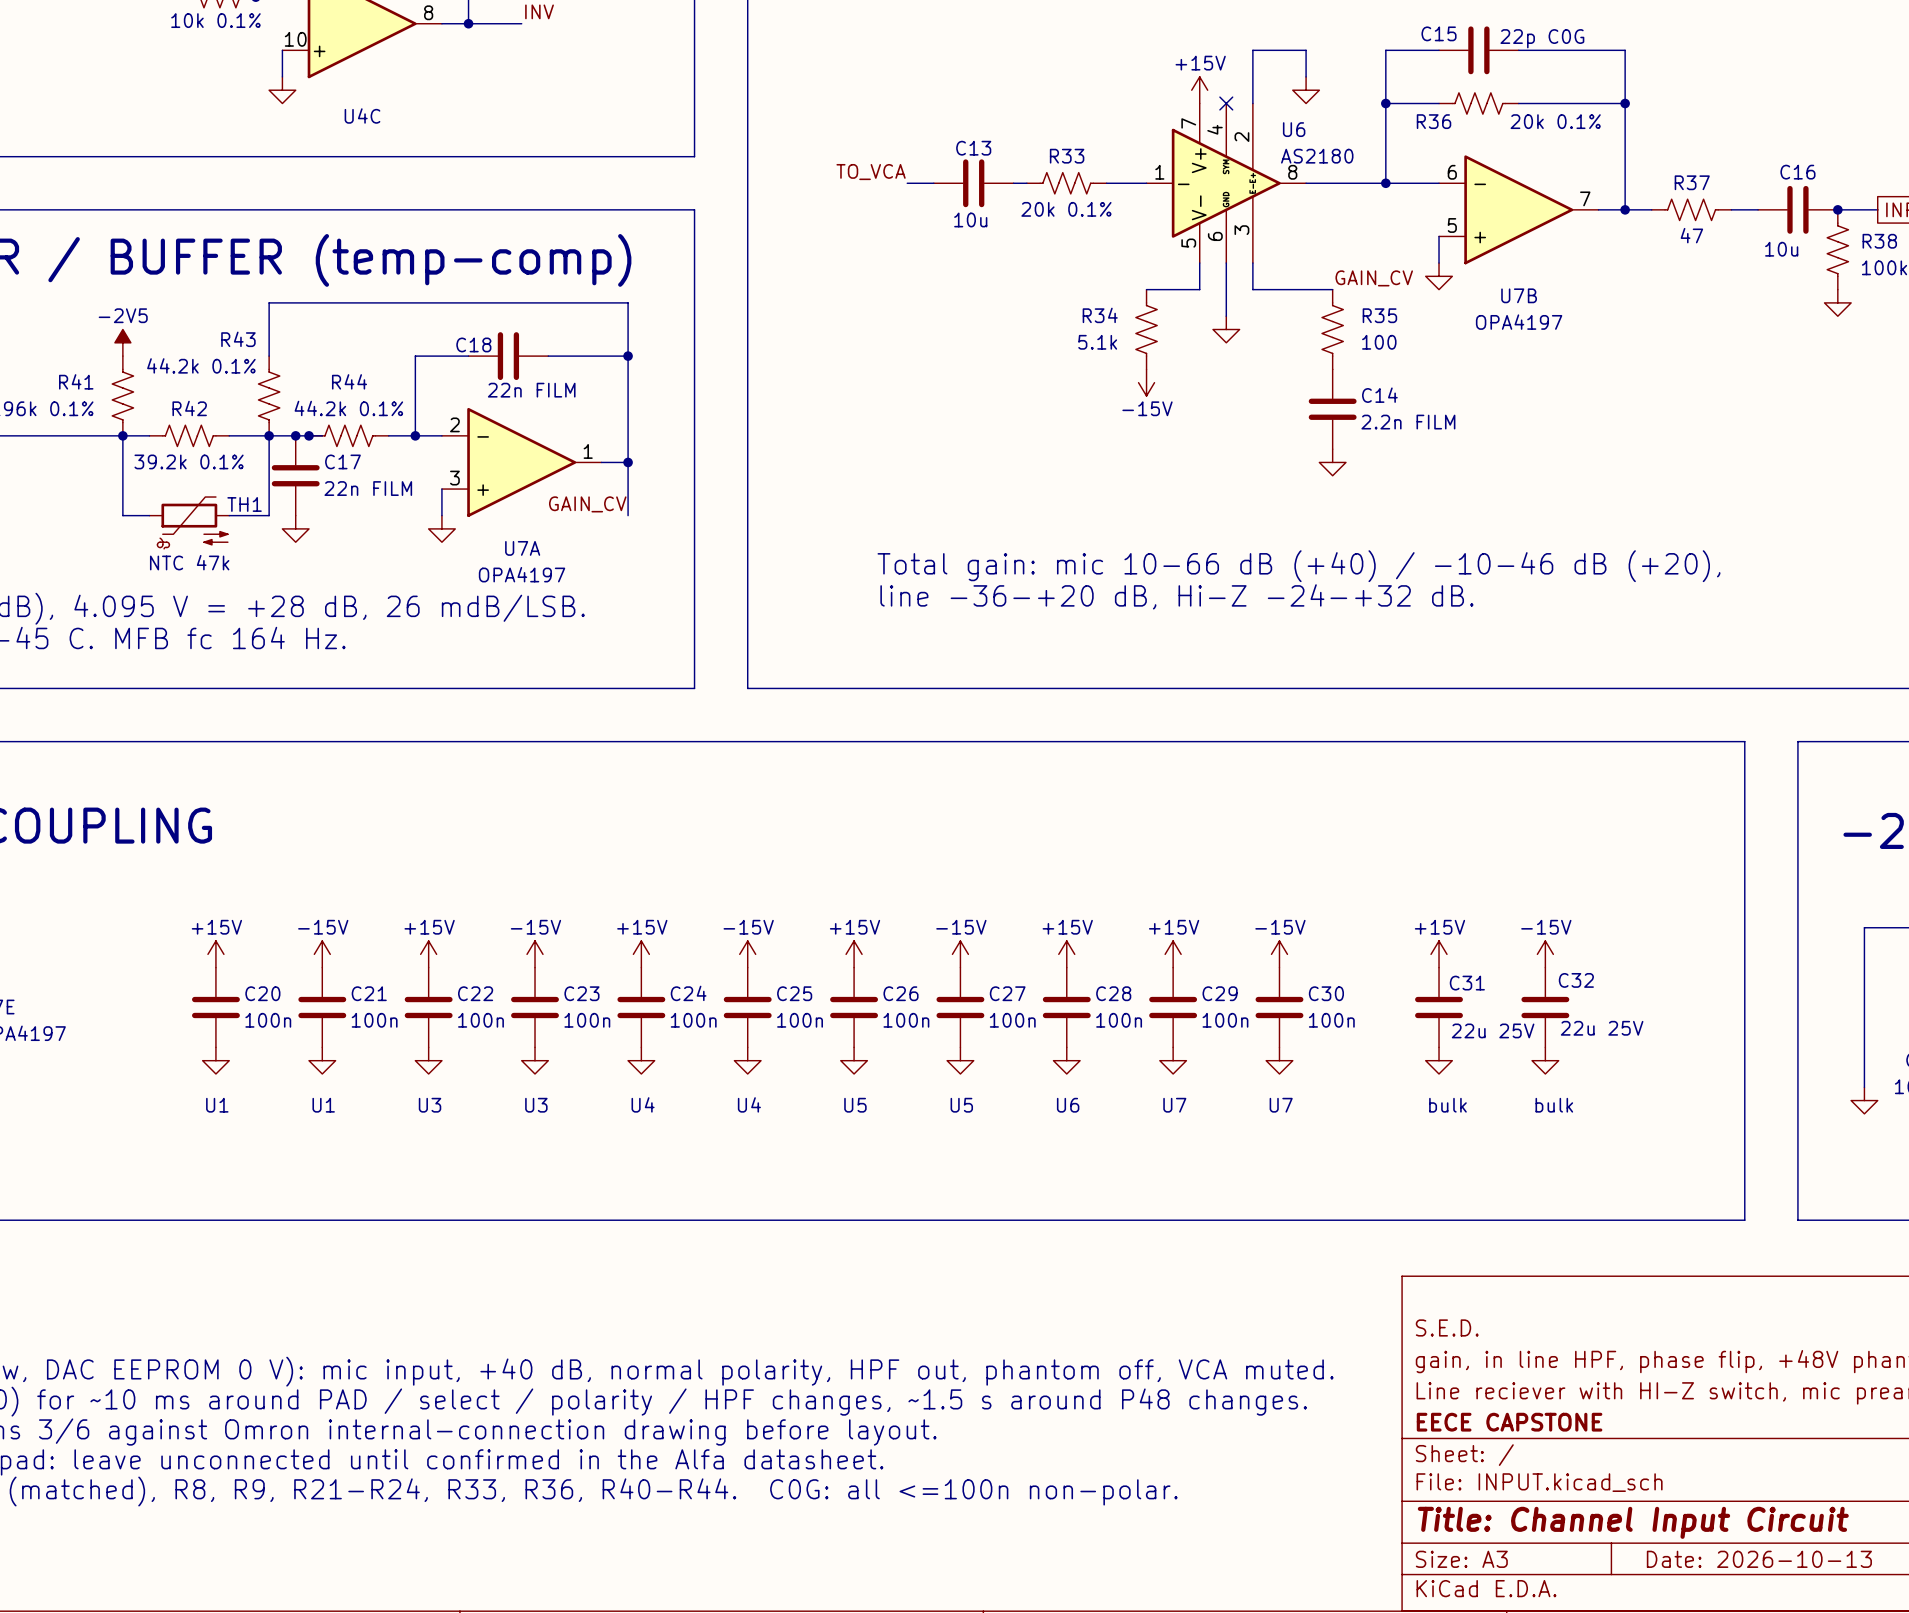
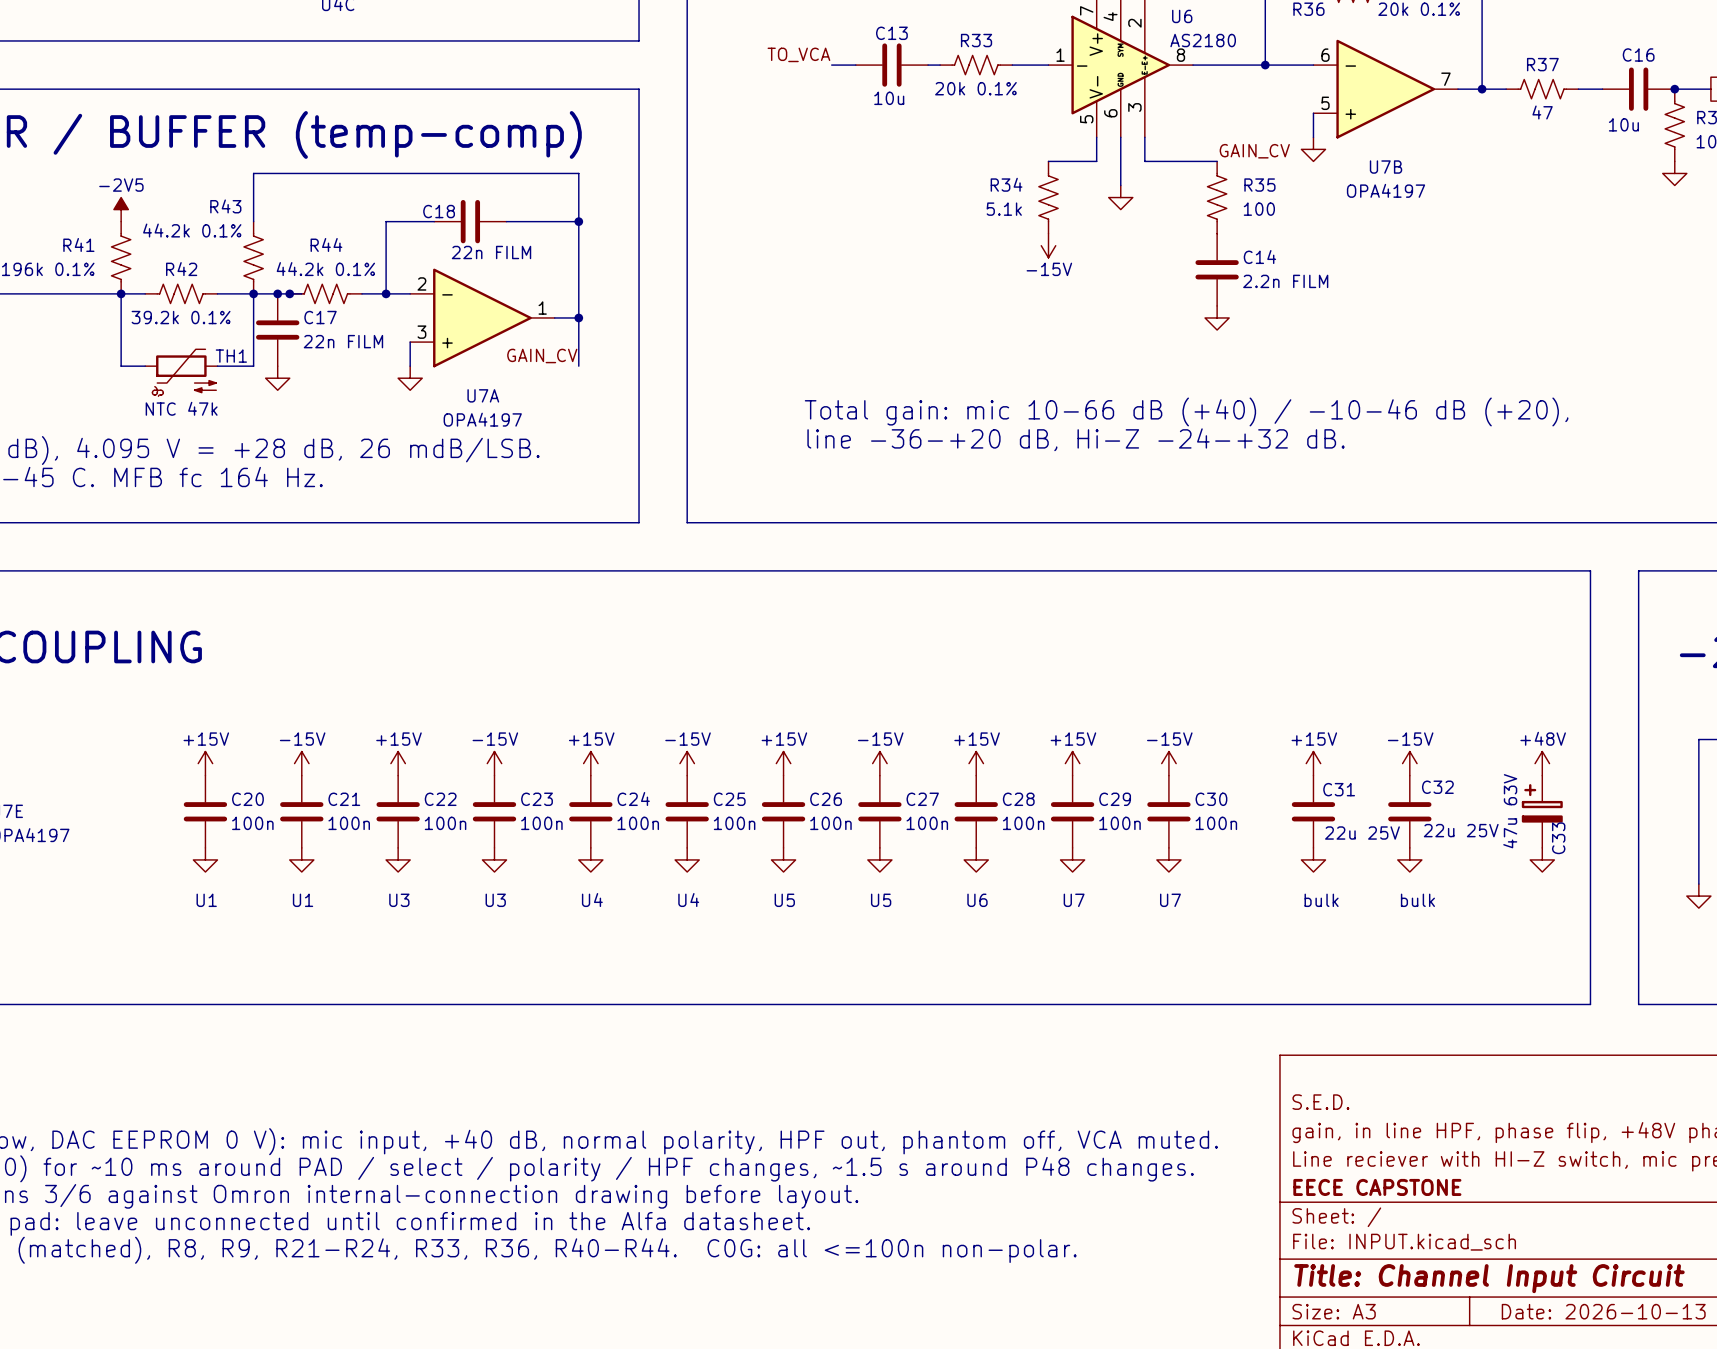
power symbol: none -> +48V (1542, 763)
C33: none -> 47u 63V (1542, 811)
power symbol: none -> (1542, 859)

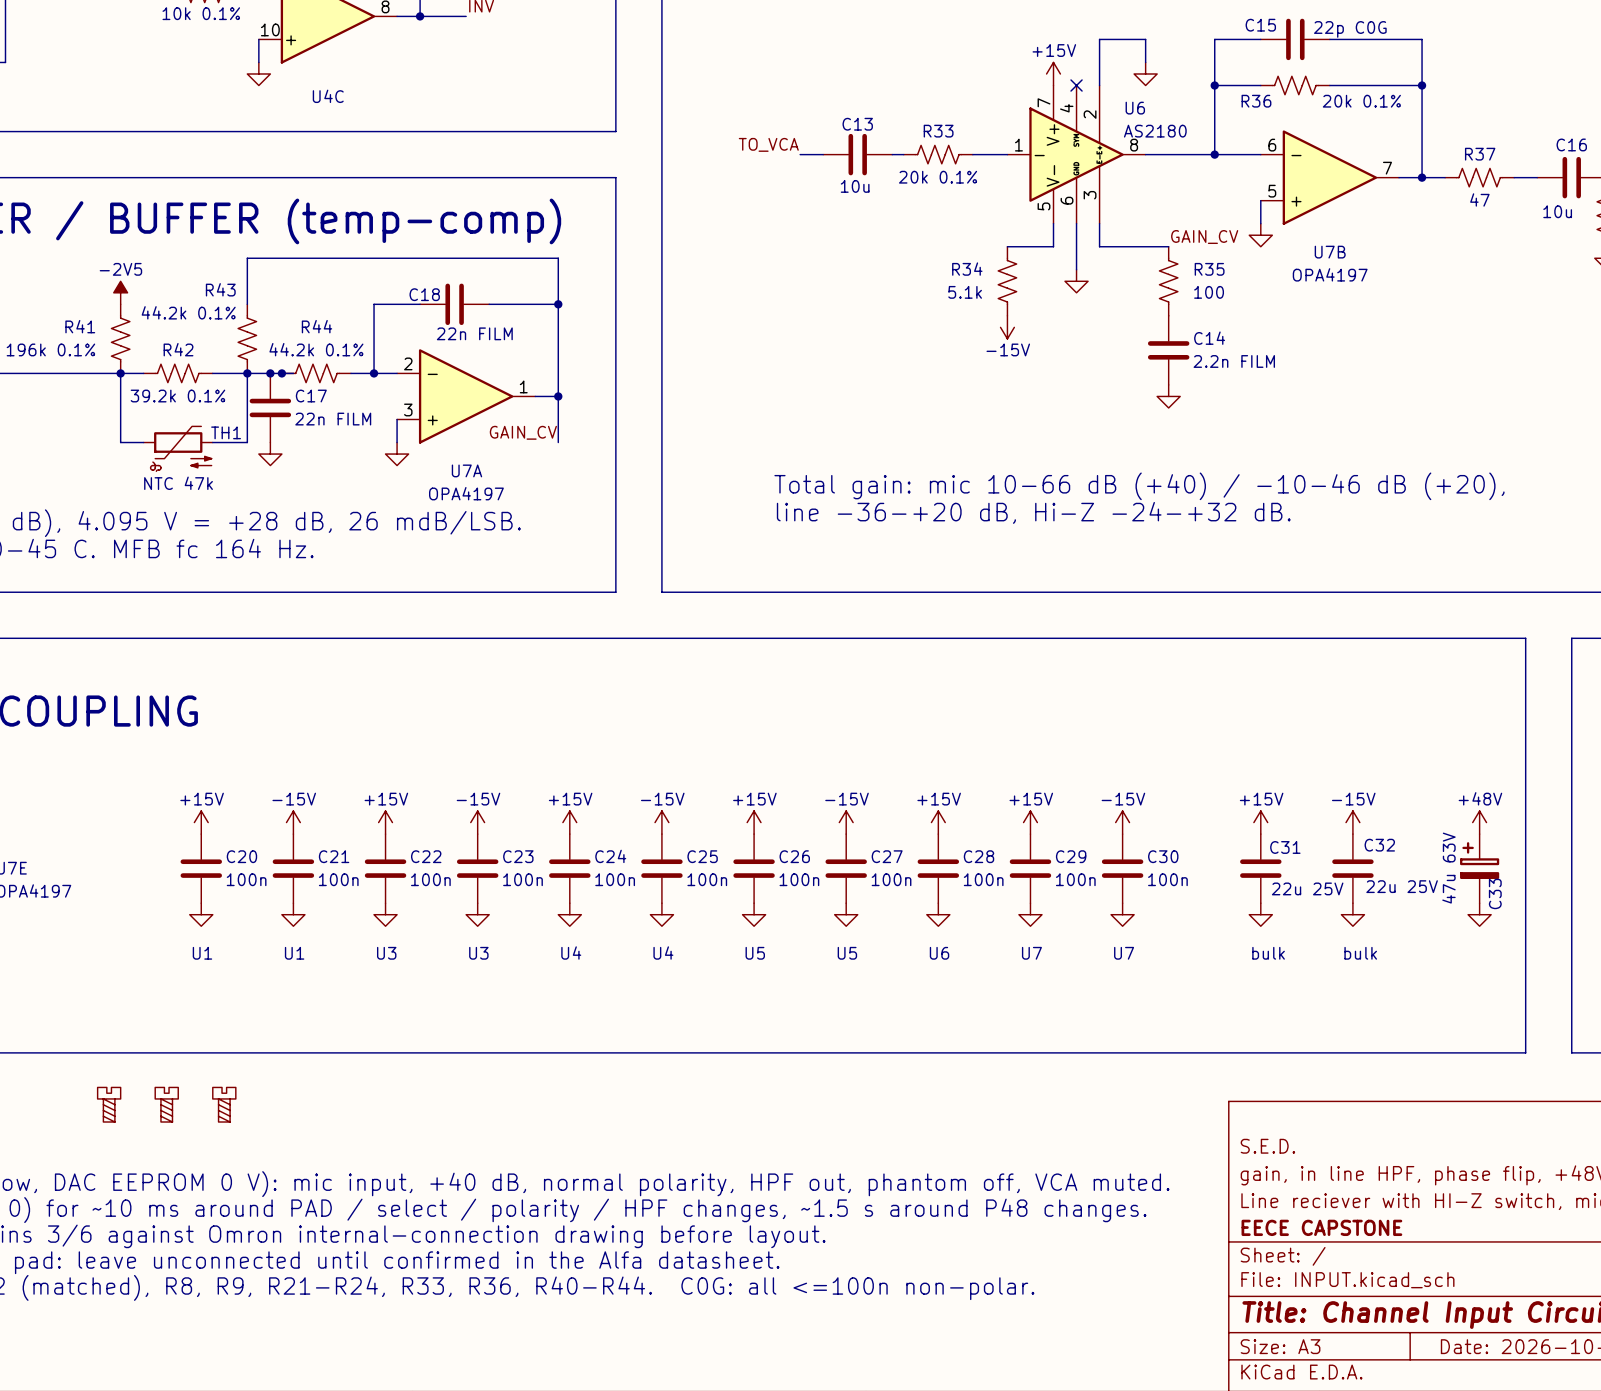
part: none -> (109, 1104)
part: none -> (166, 1104)
part: none -> (224, 1104)

